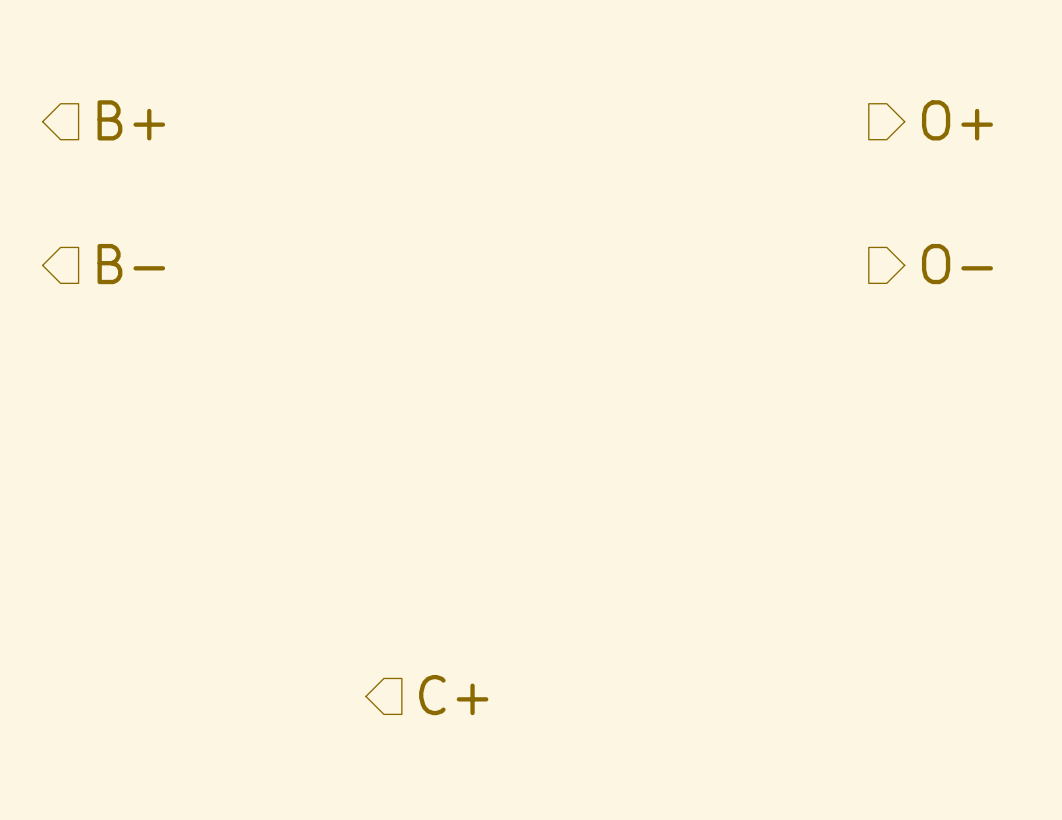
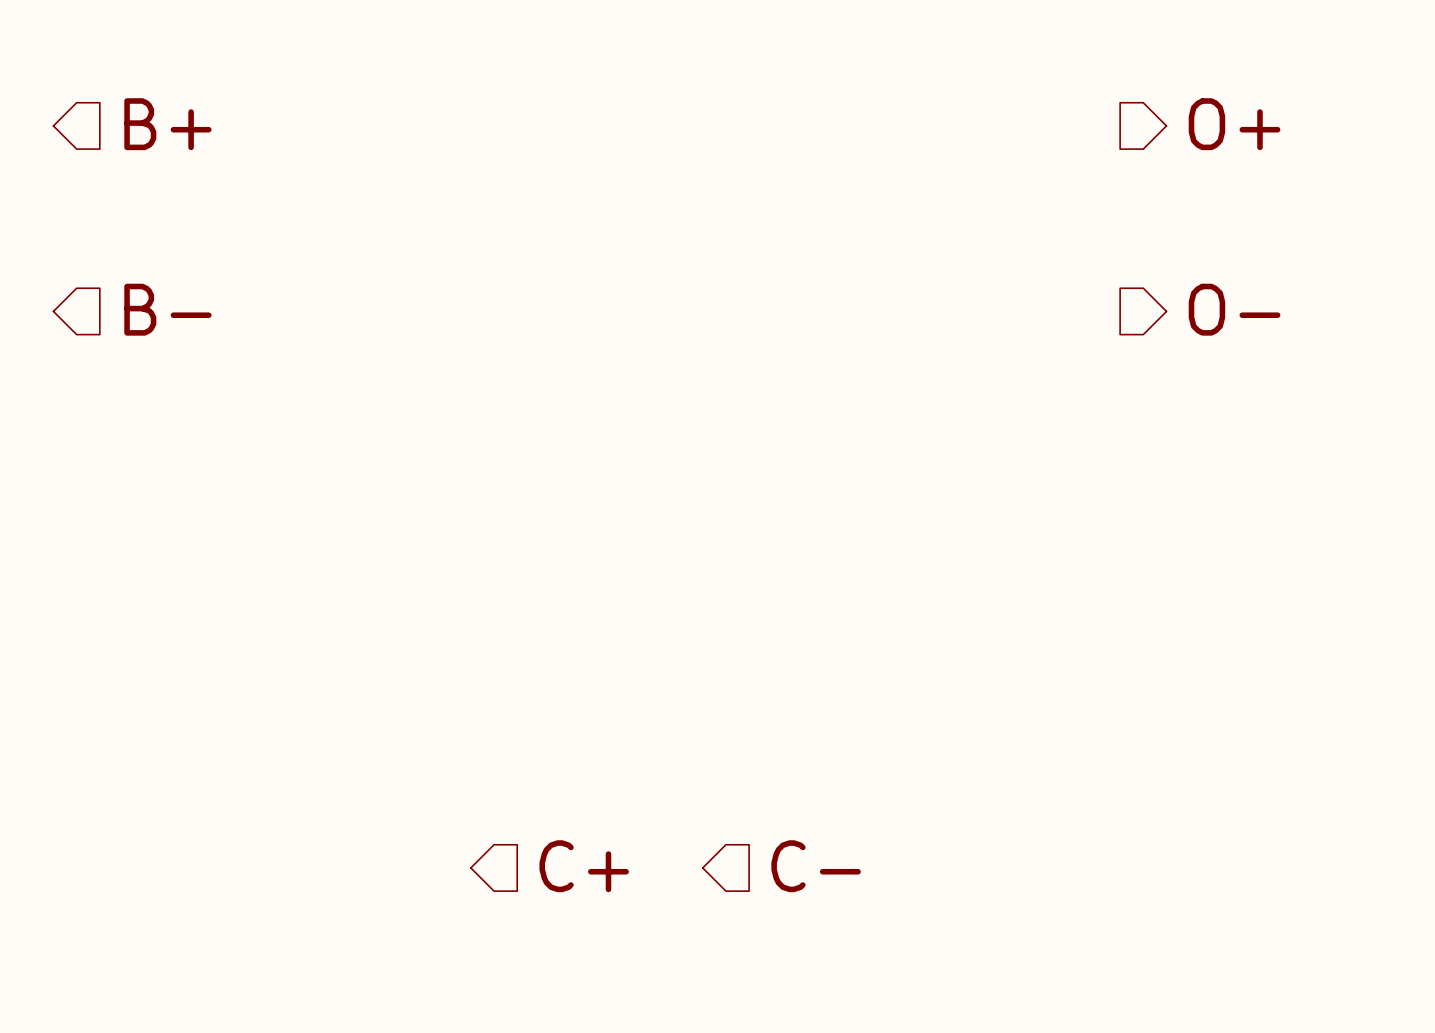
hierarchical label: none -> C- (816, 866)

